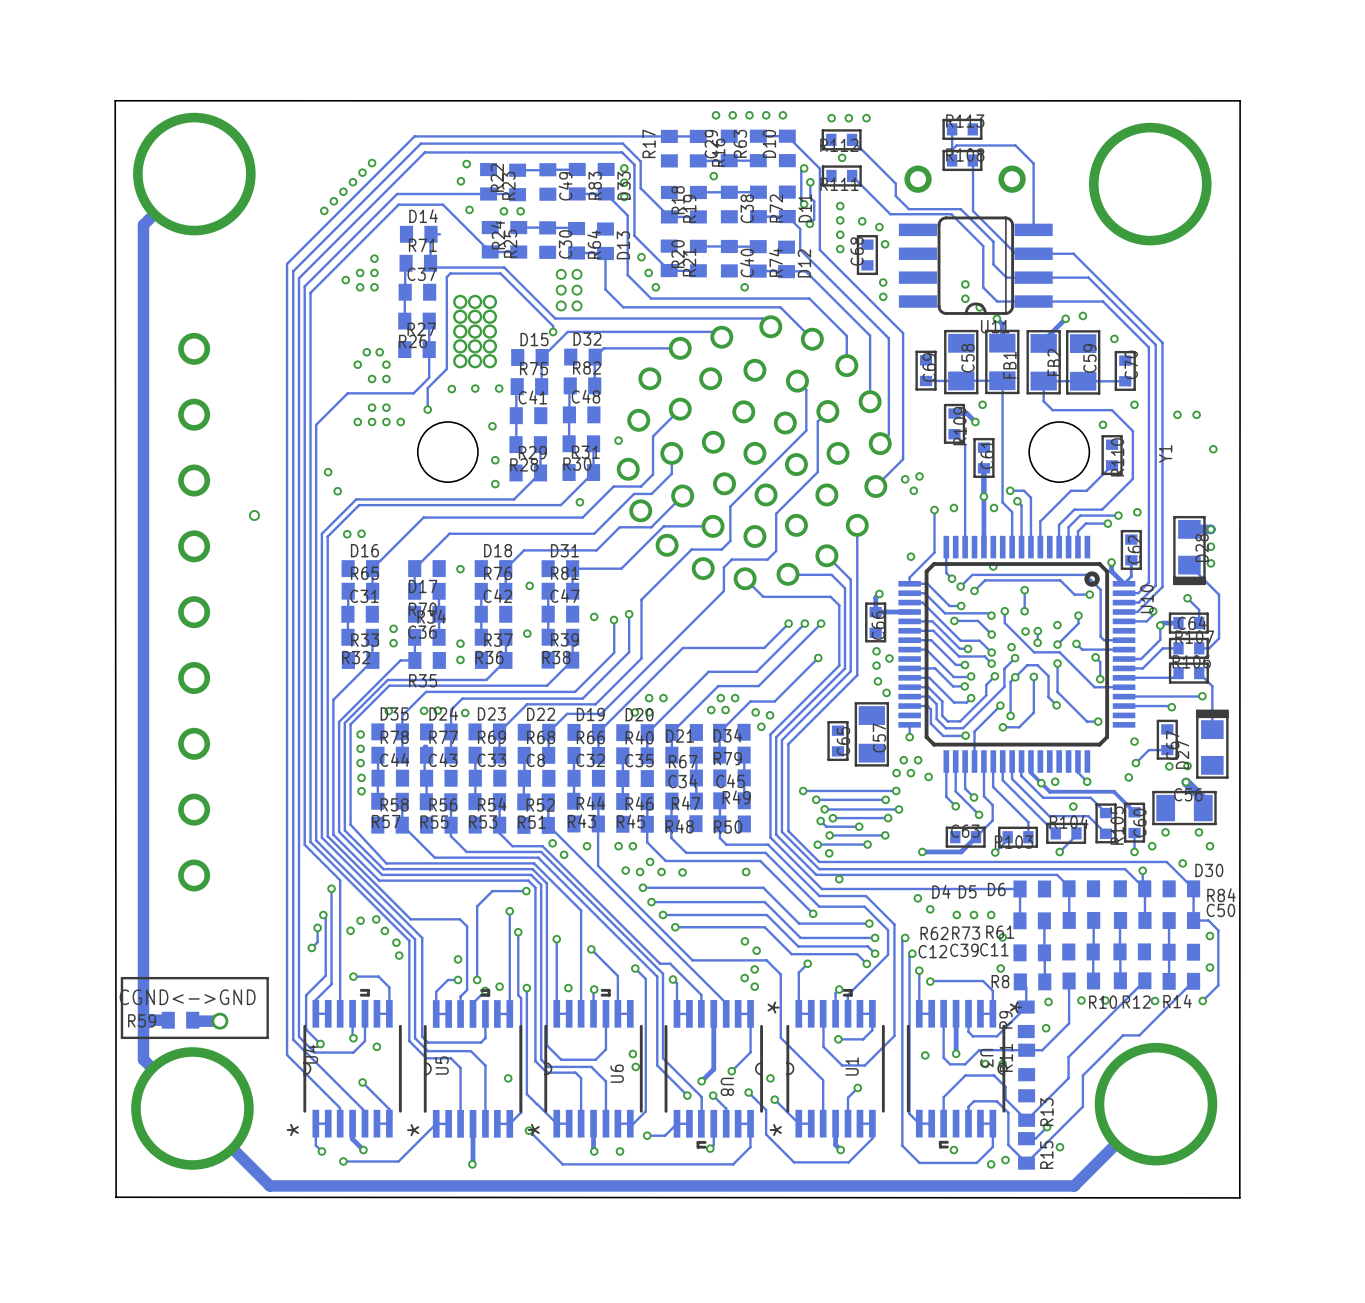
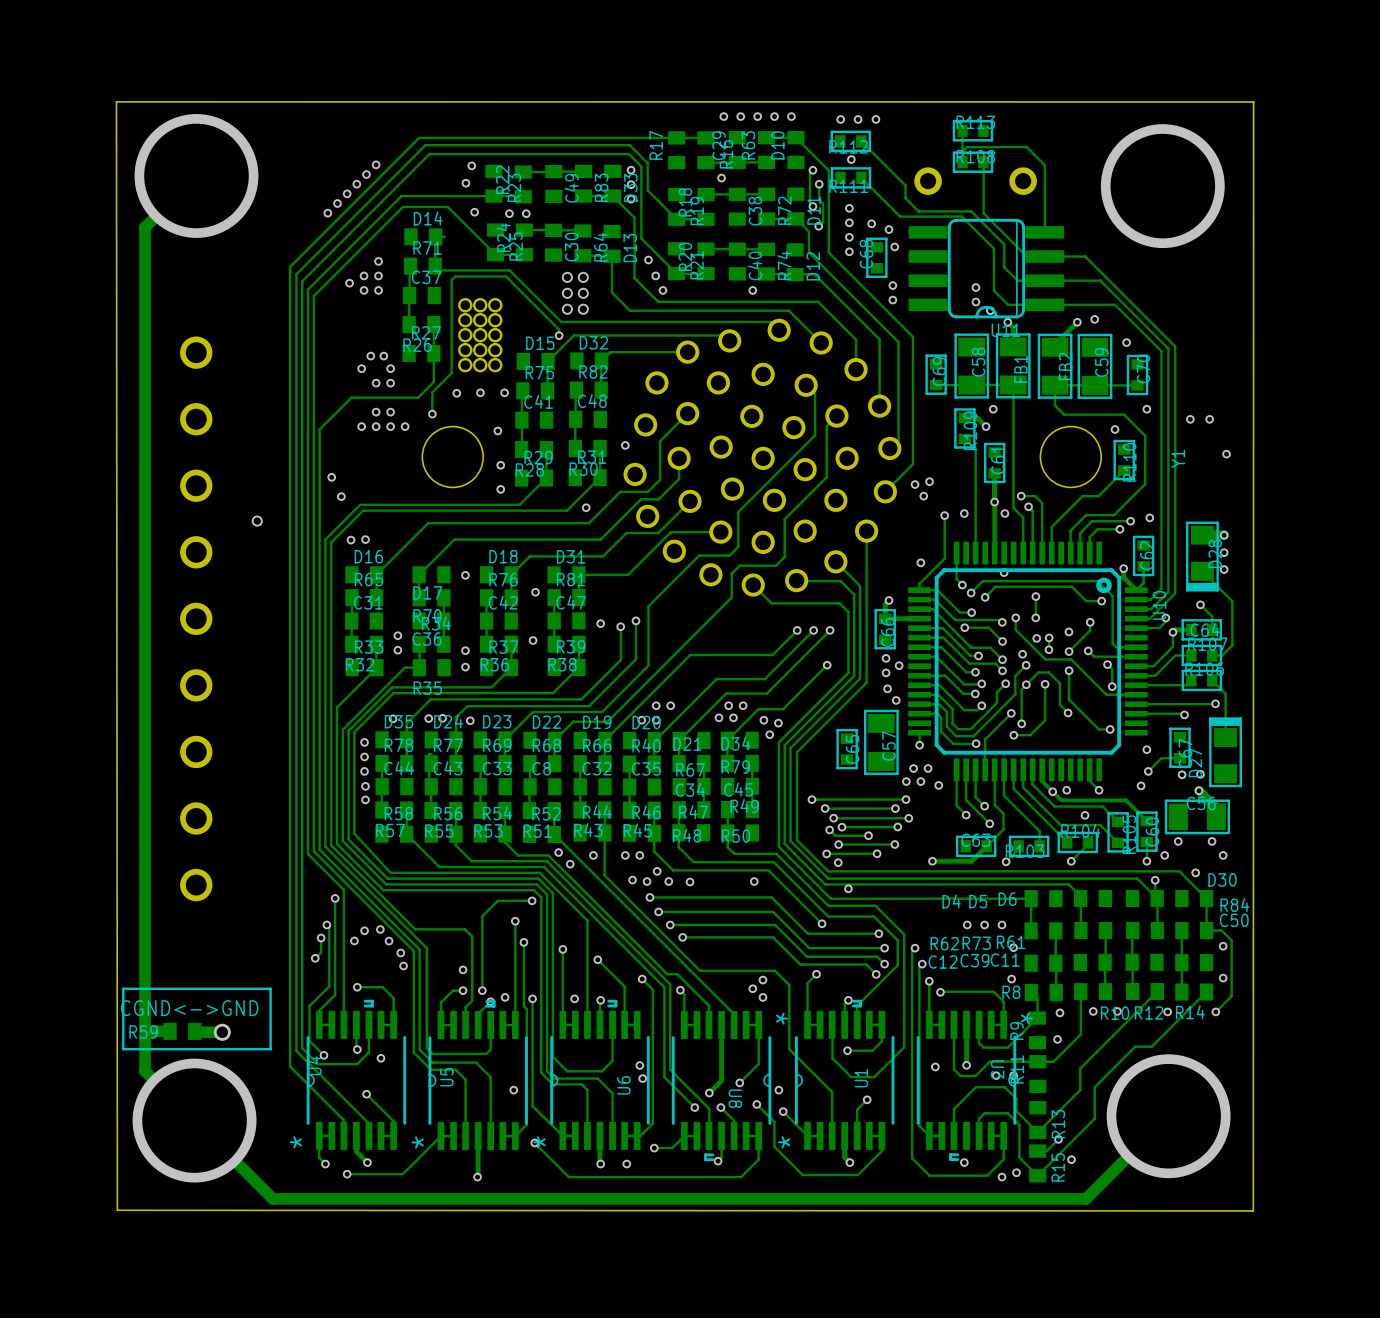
via: (917, 898) -> none
via: (930, 909) -> none
via: (744, 941) -> none
via: (756, 950) -> none

